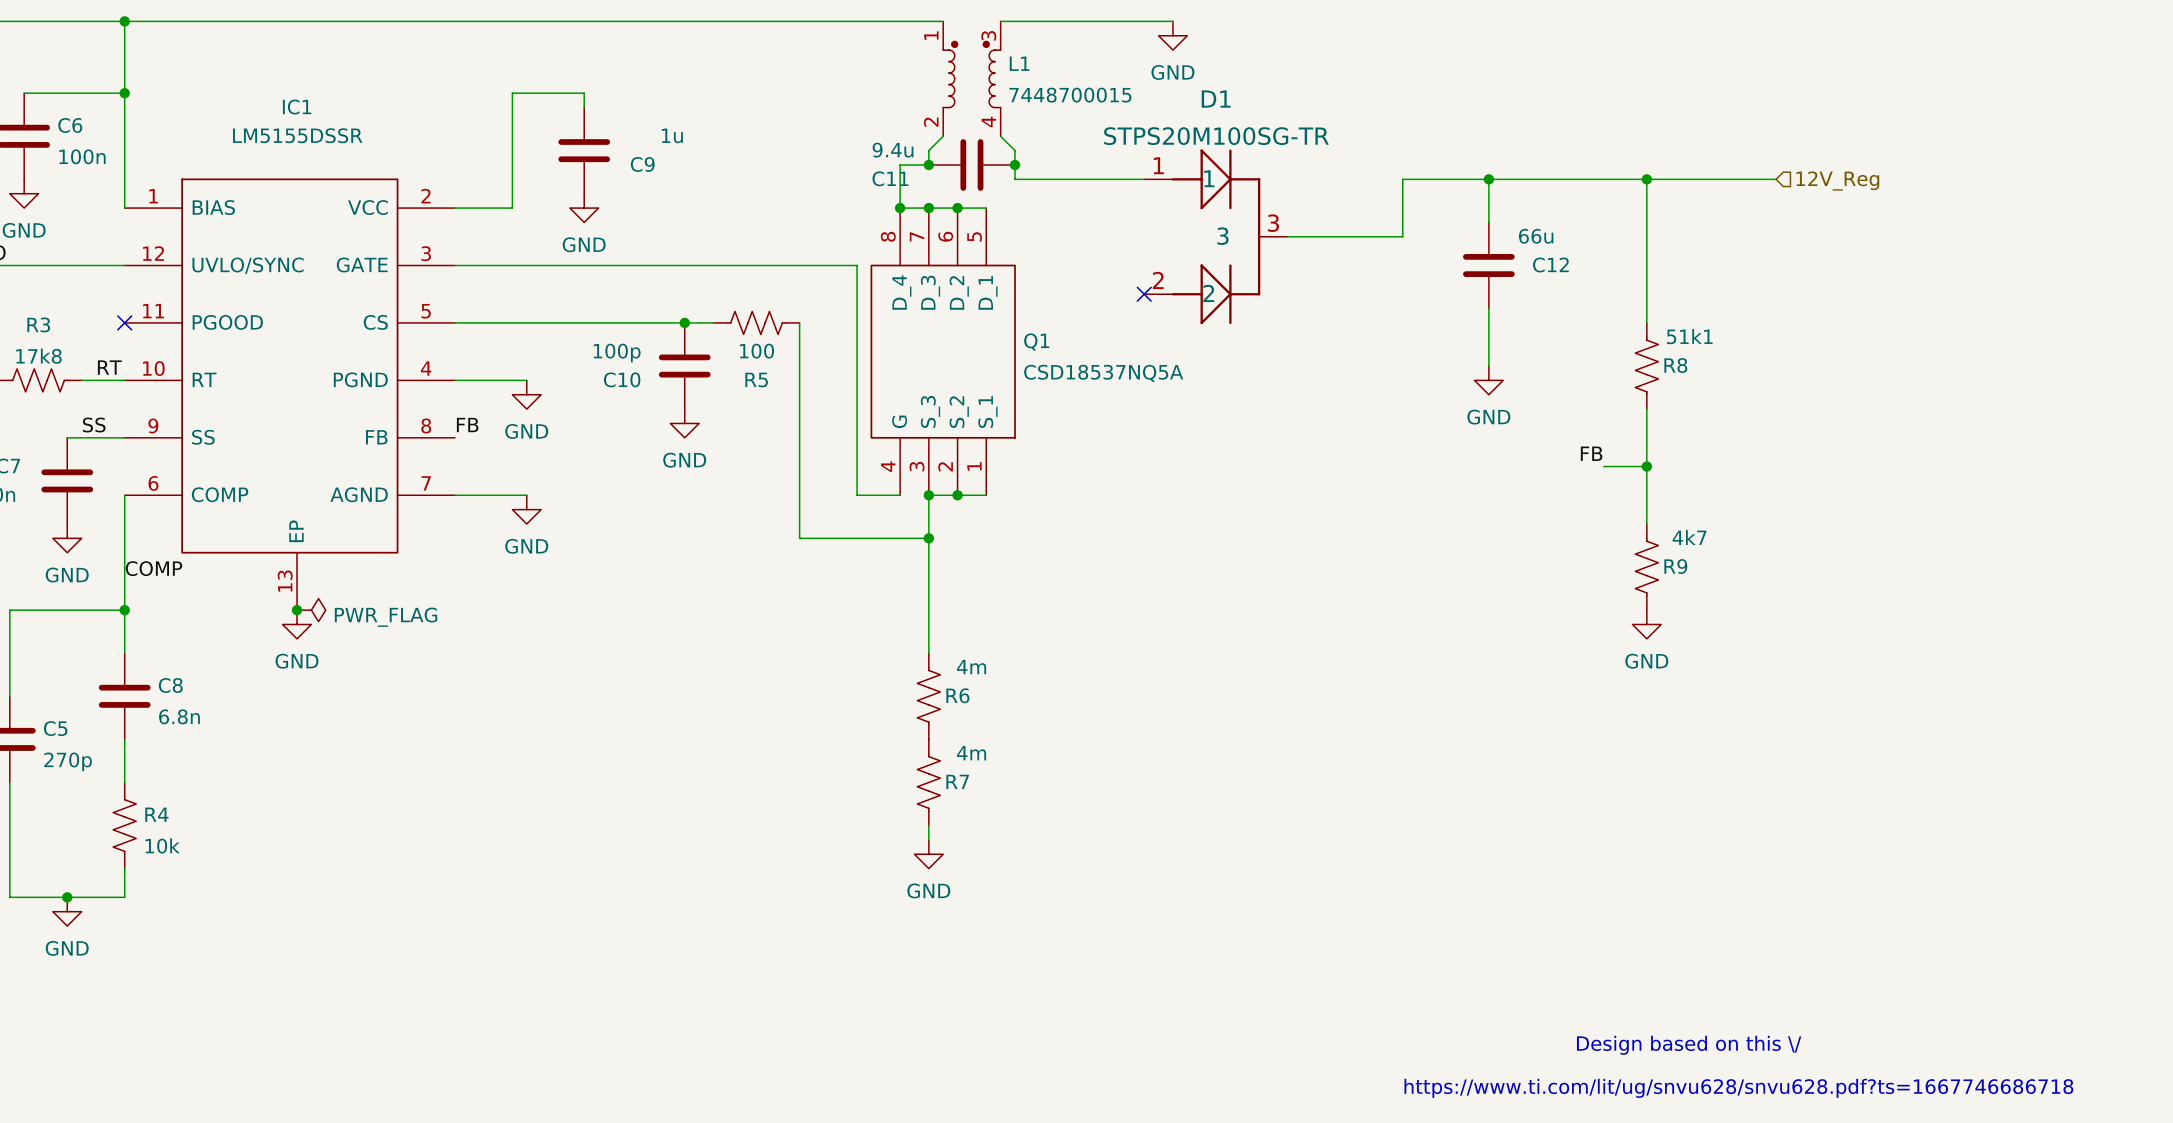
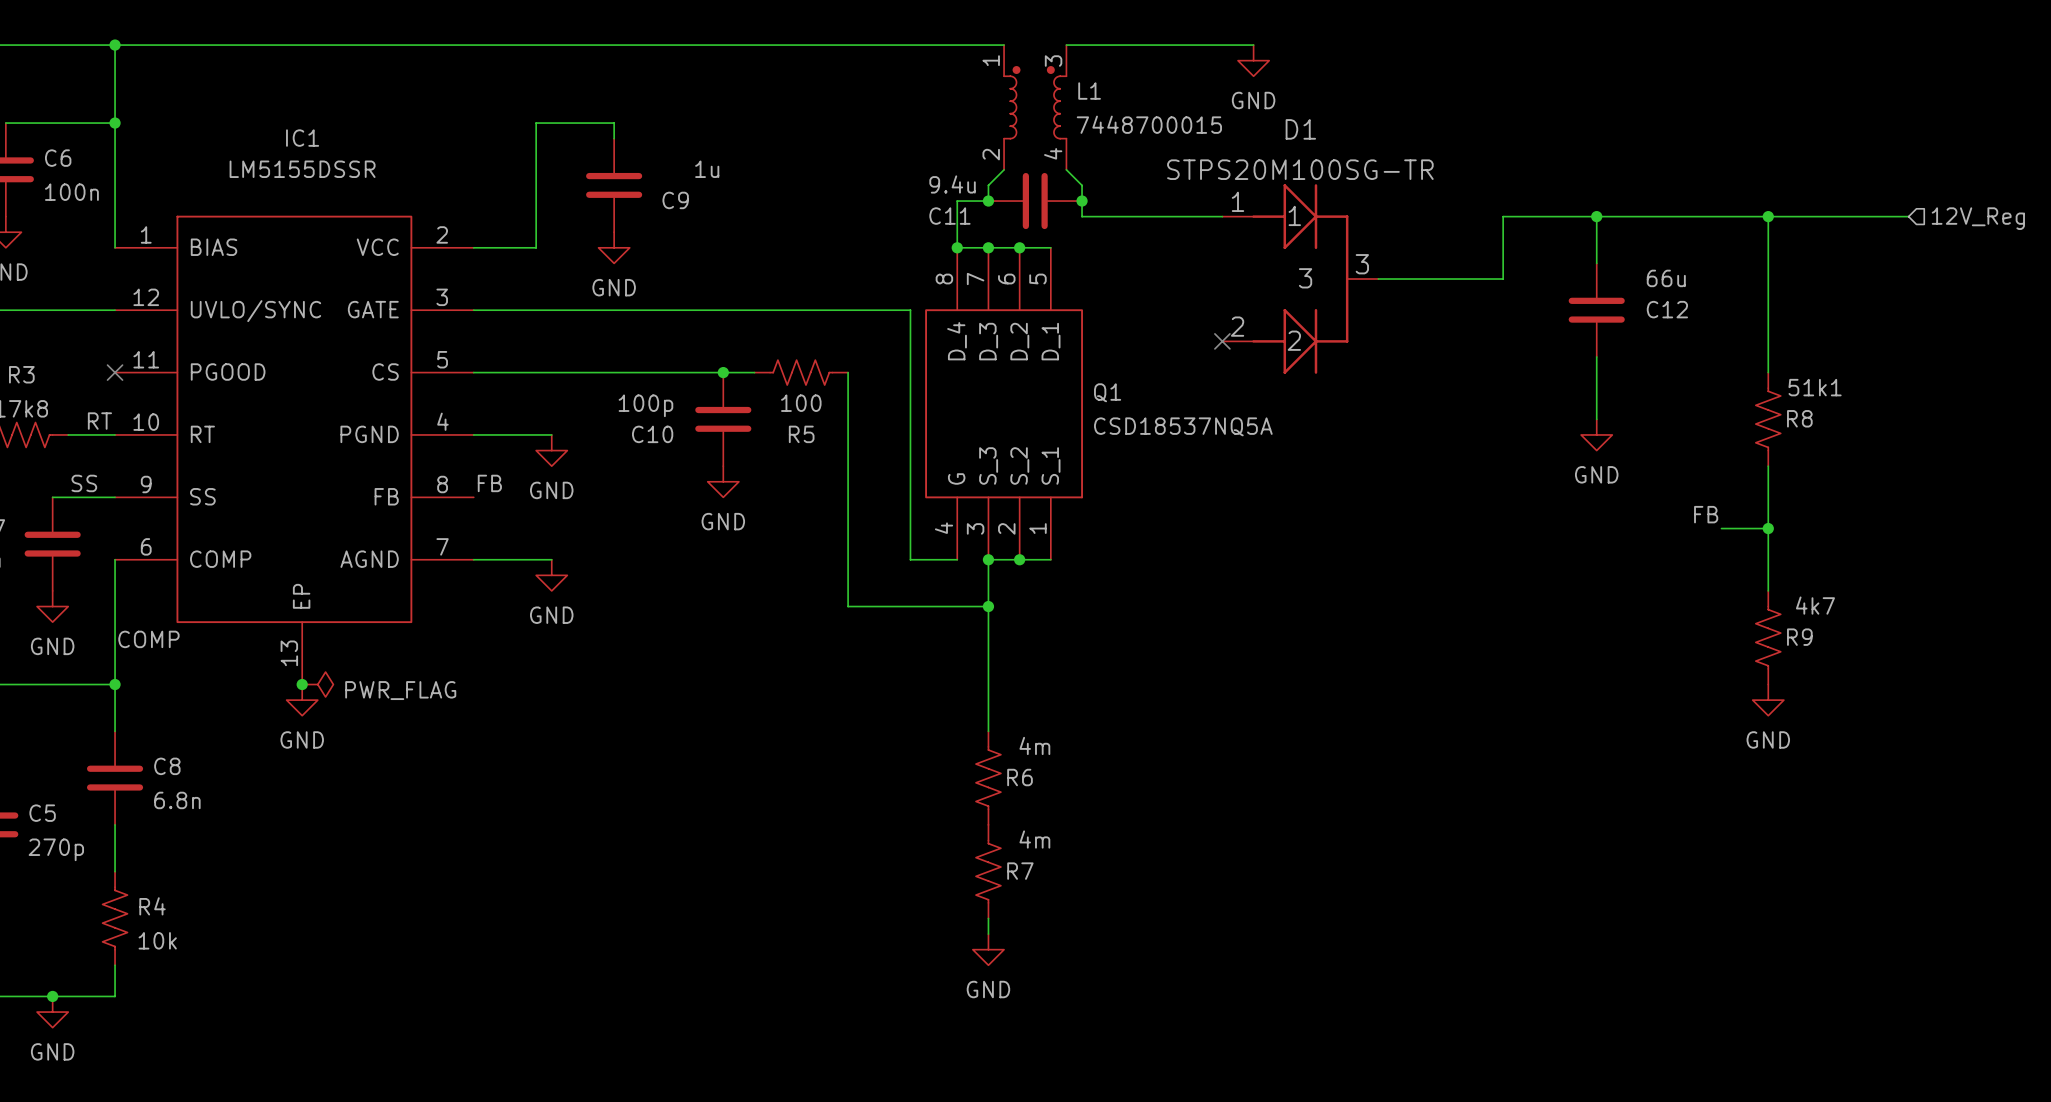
C12 value position: 66u (1536, 236) -> 66u (1666, 278)

